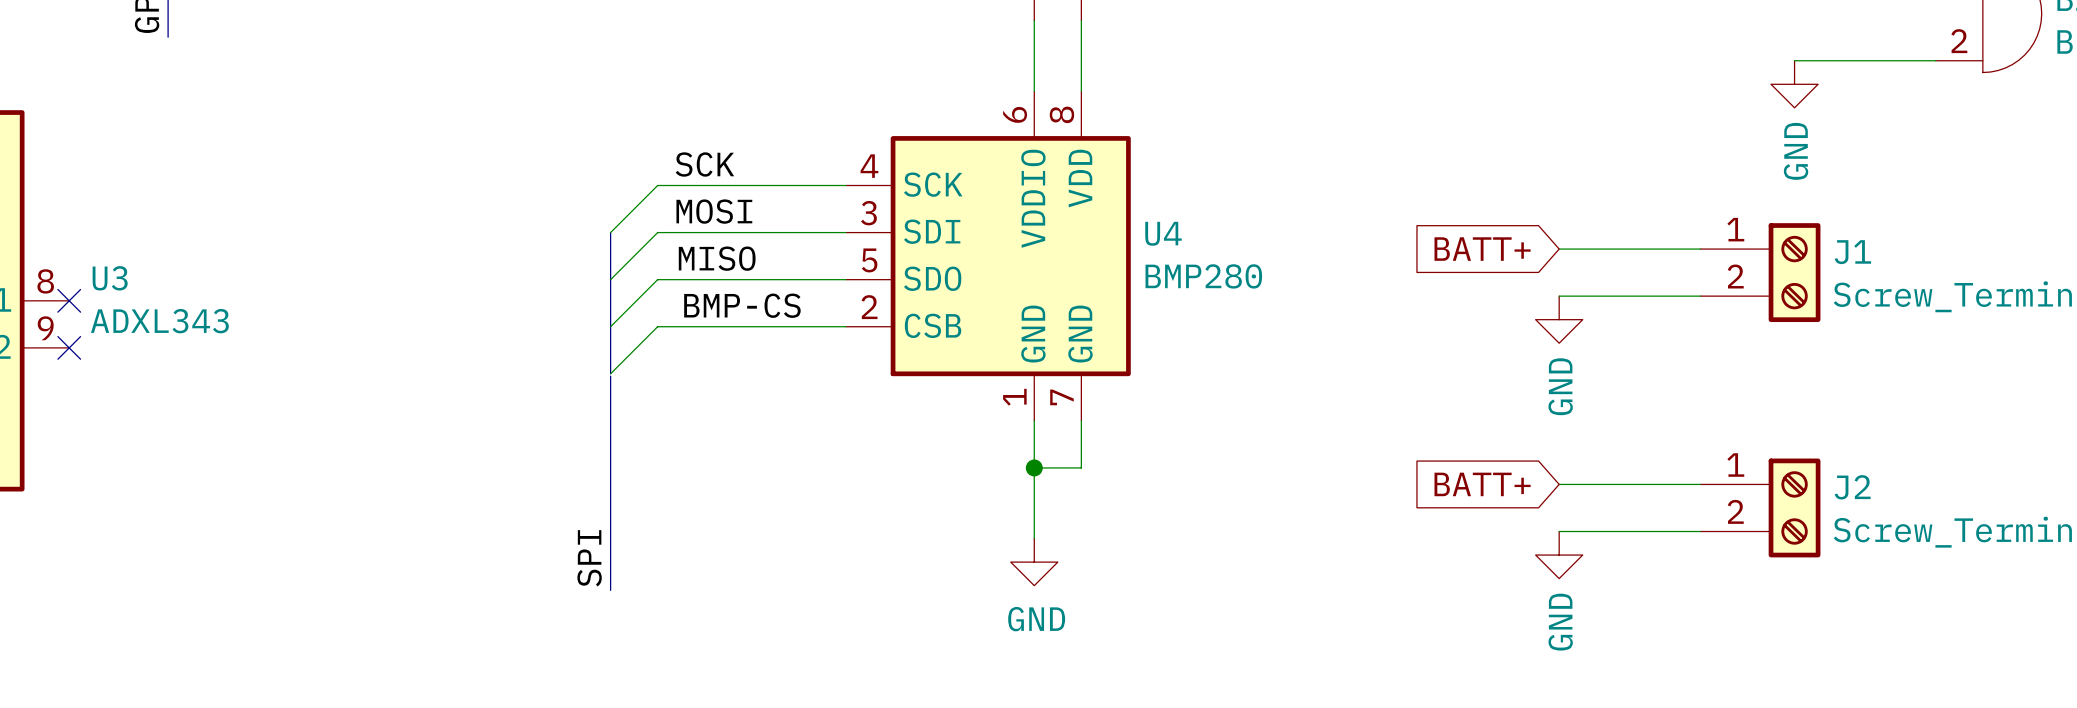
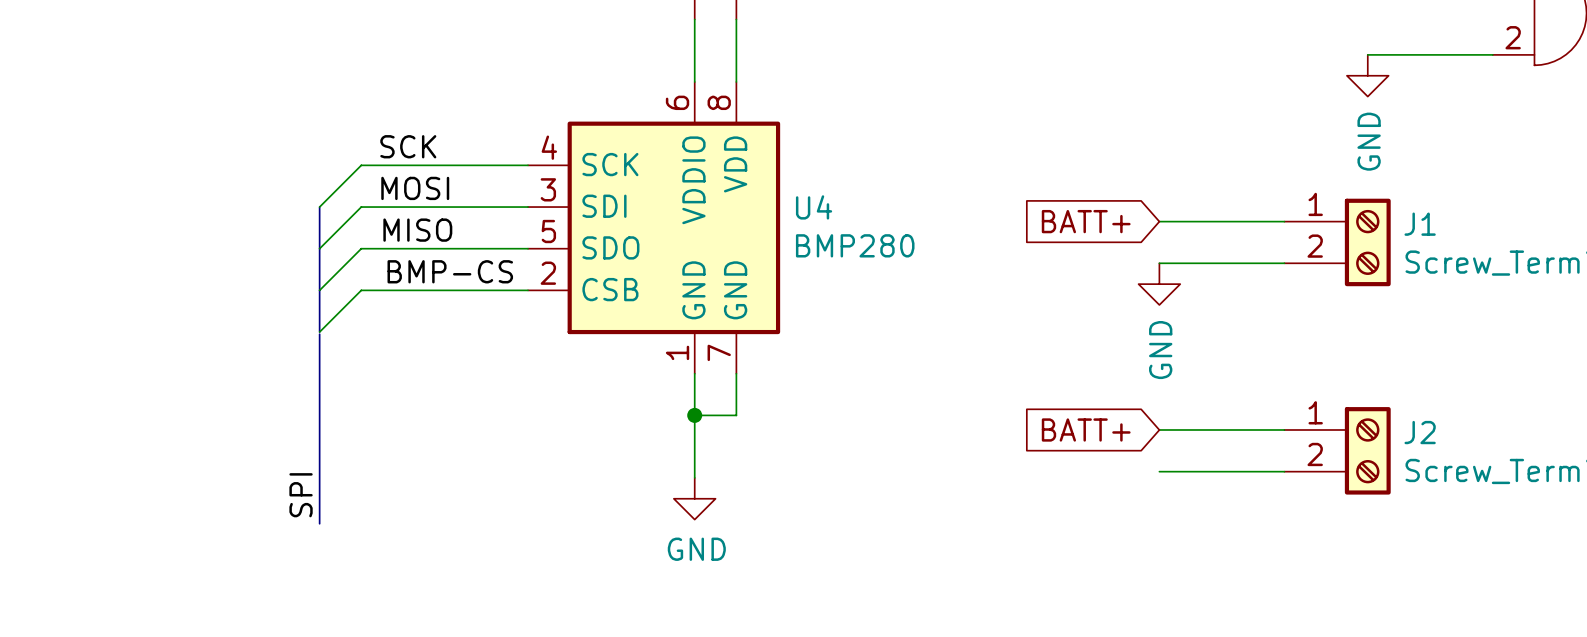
power symbol: GND (1559, 555) -> none

